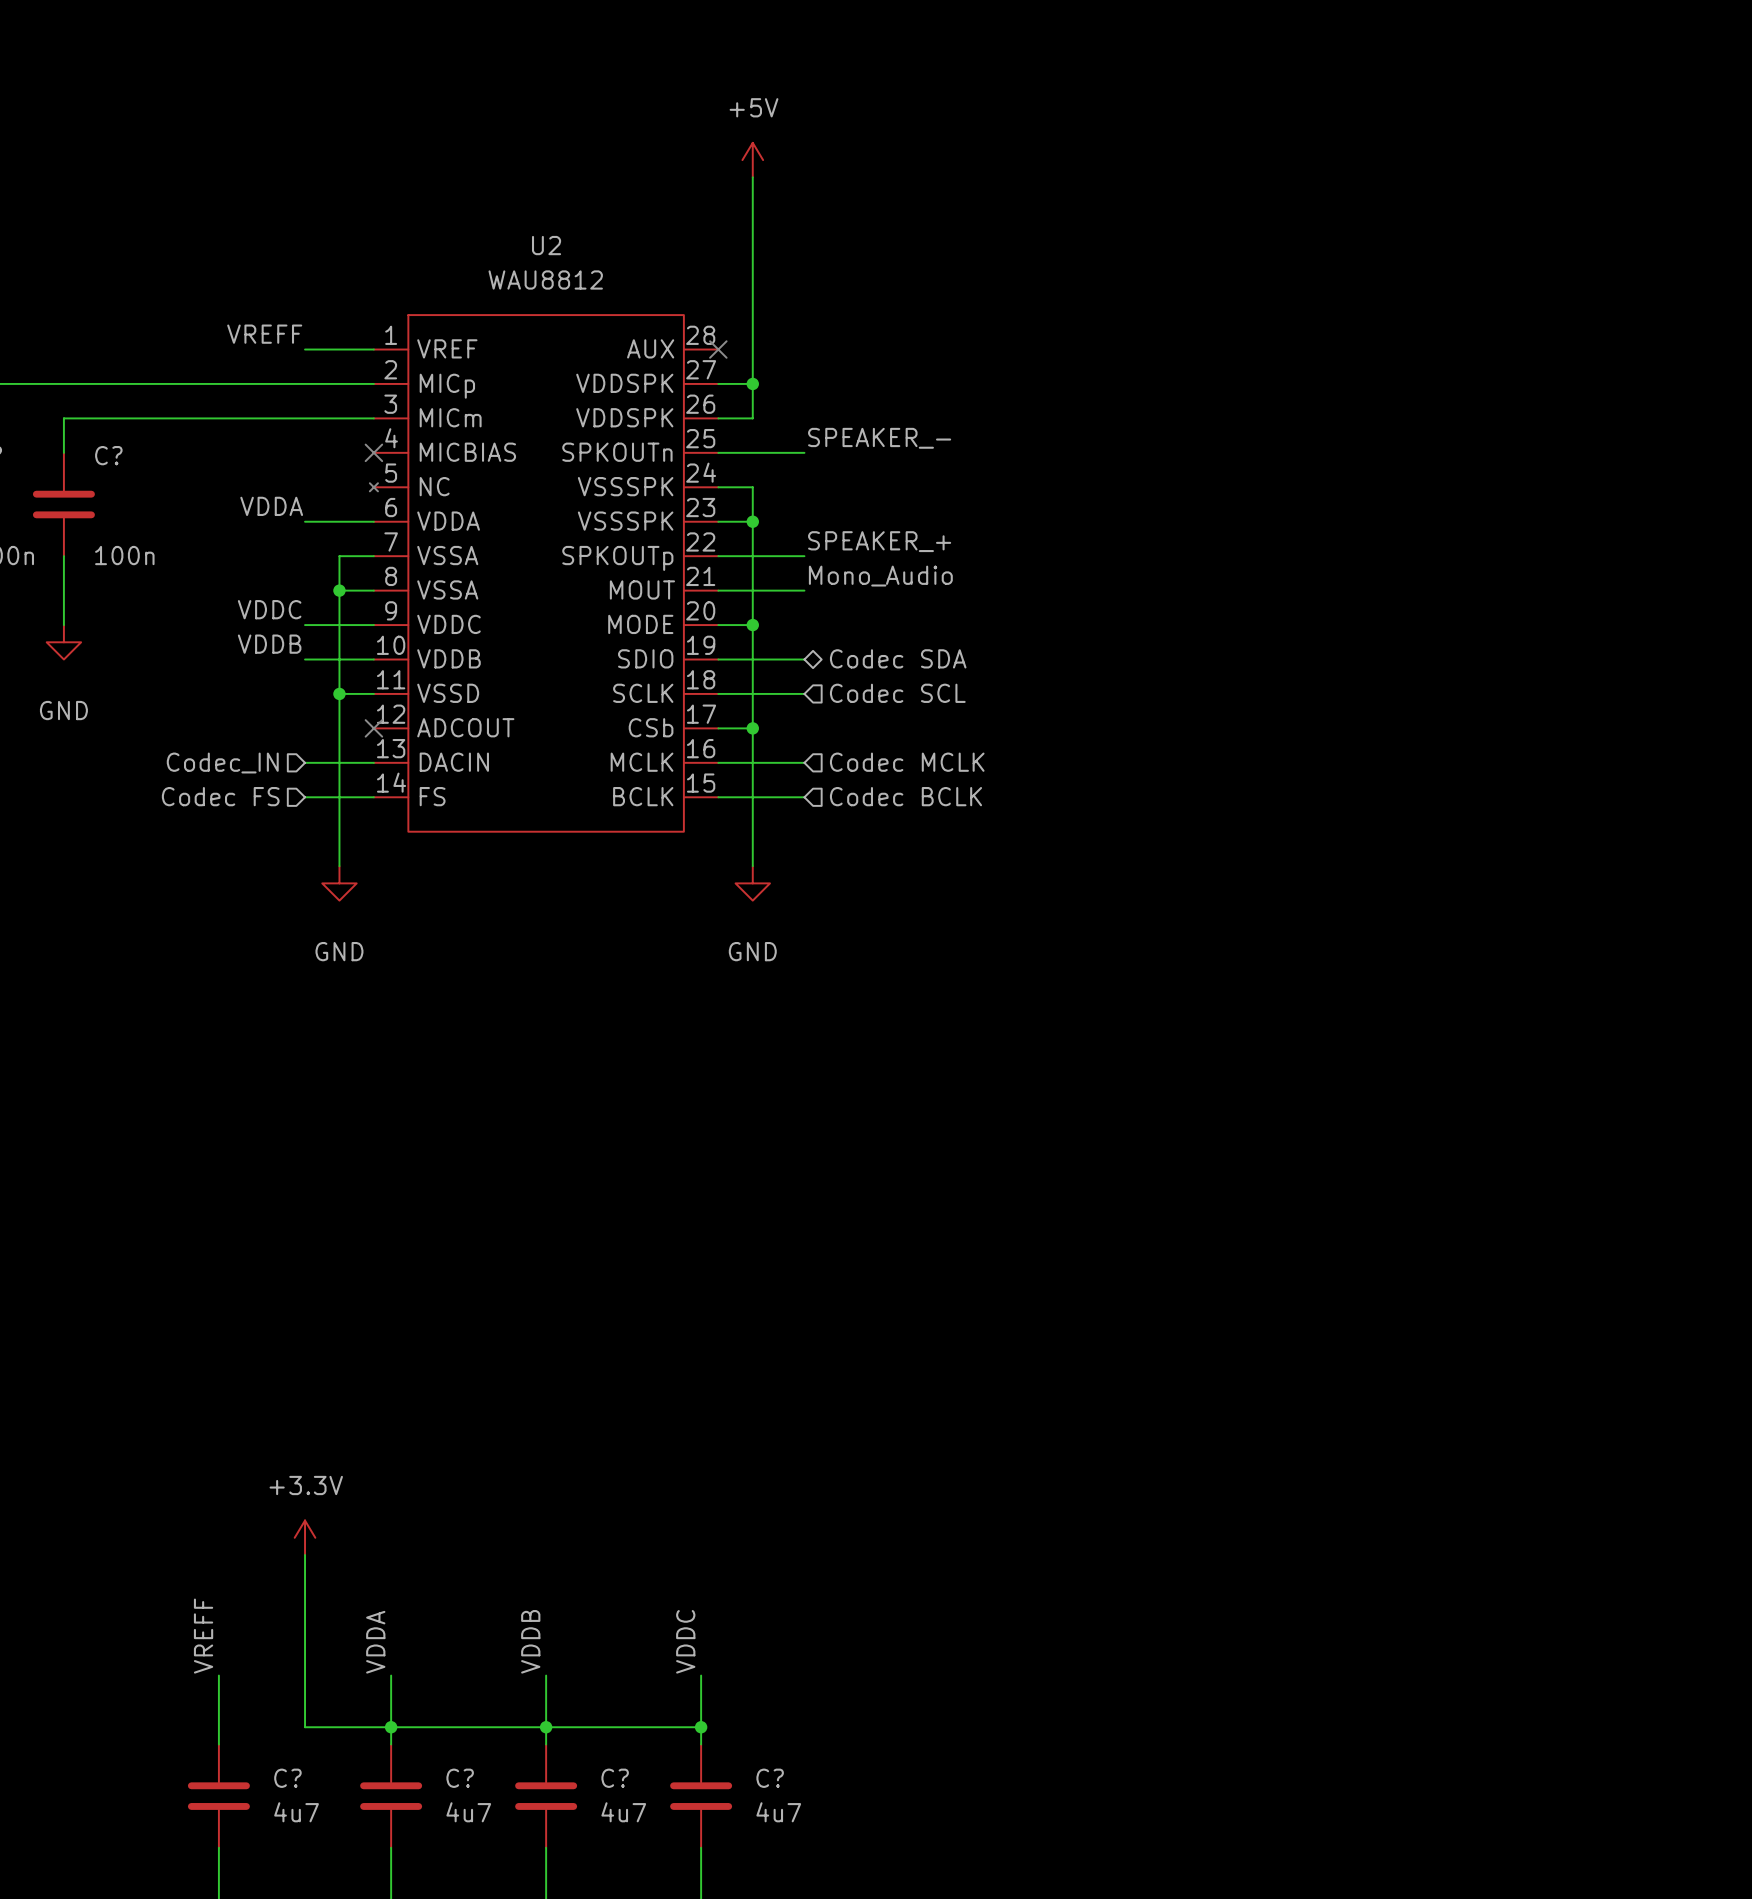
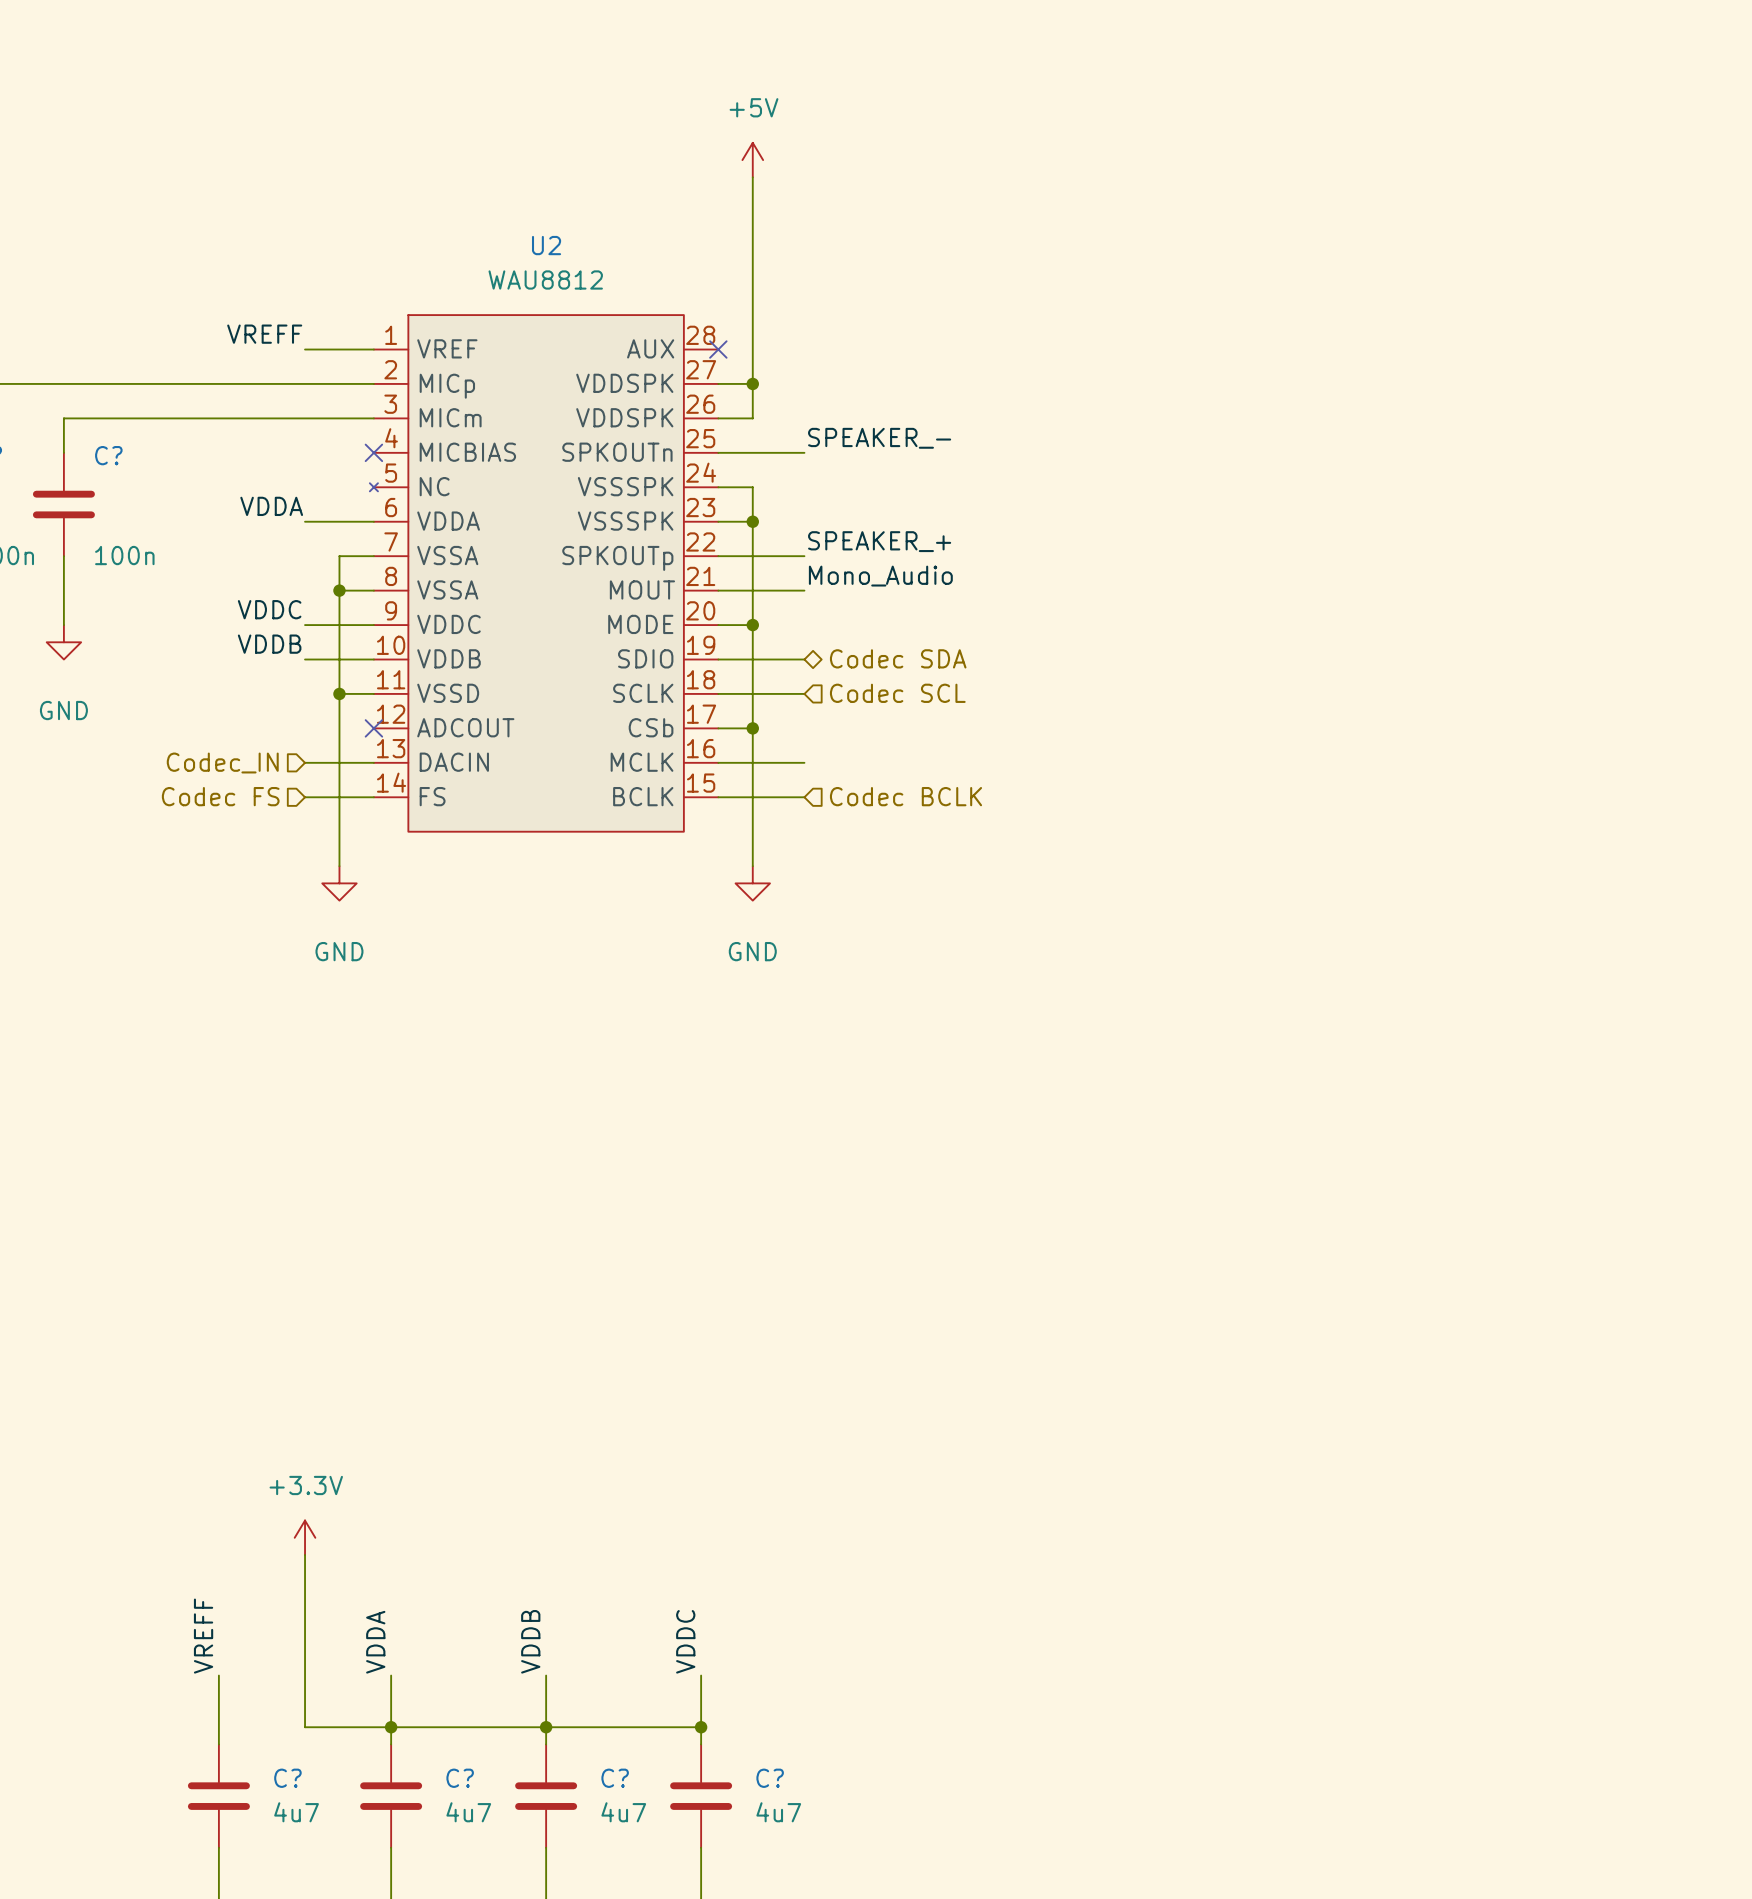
hierarchical label: Codec MCLK (907, 762) -> none

